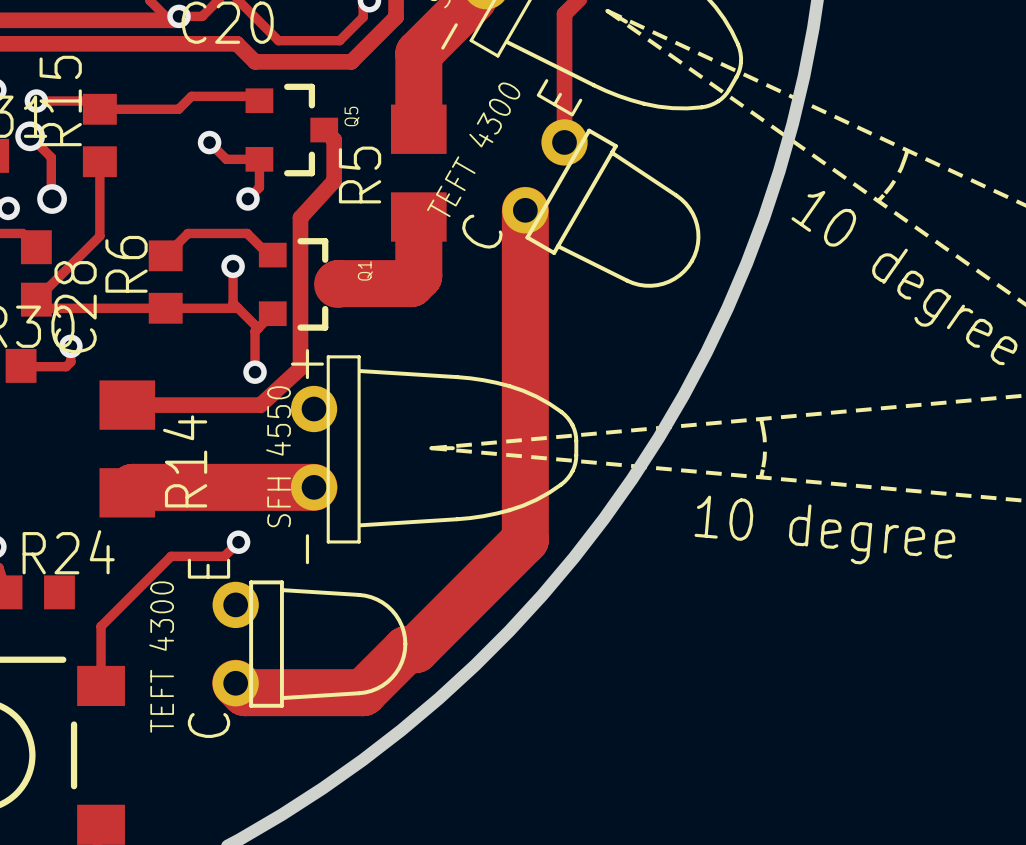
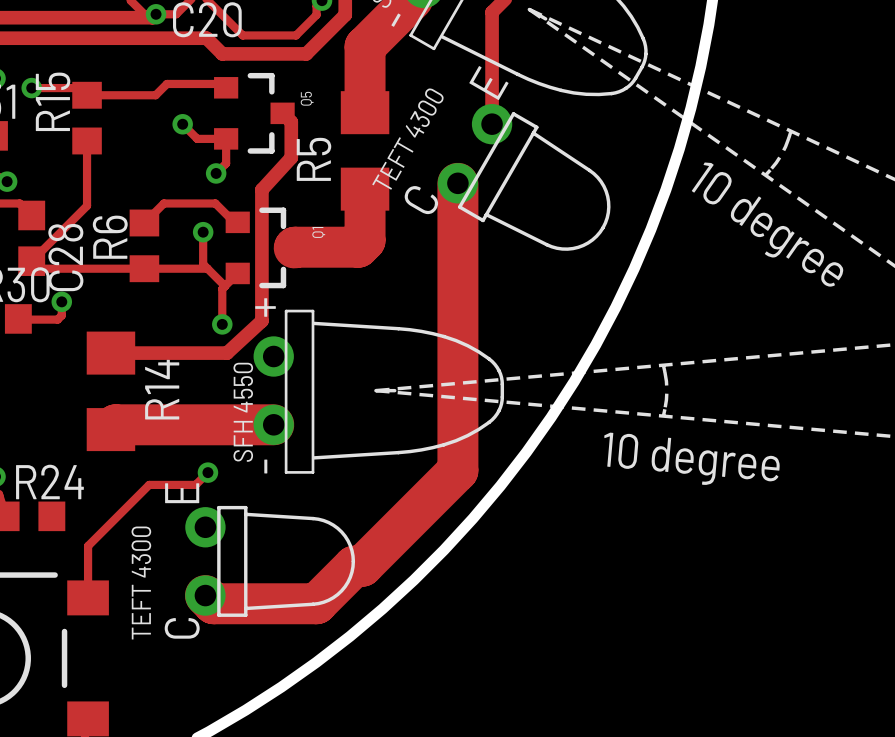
track: (30, 136) (51, 157) (52, 198) -> none
via: (30, 136) -> none
via: (52, 198) -> none

